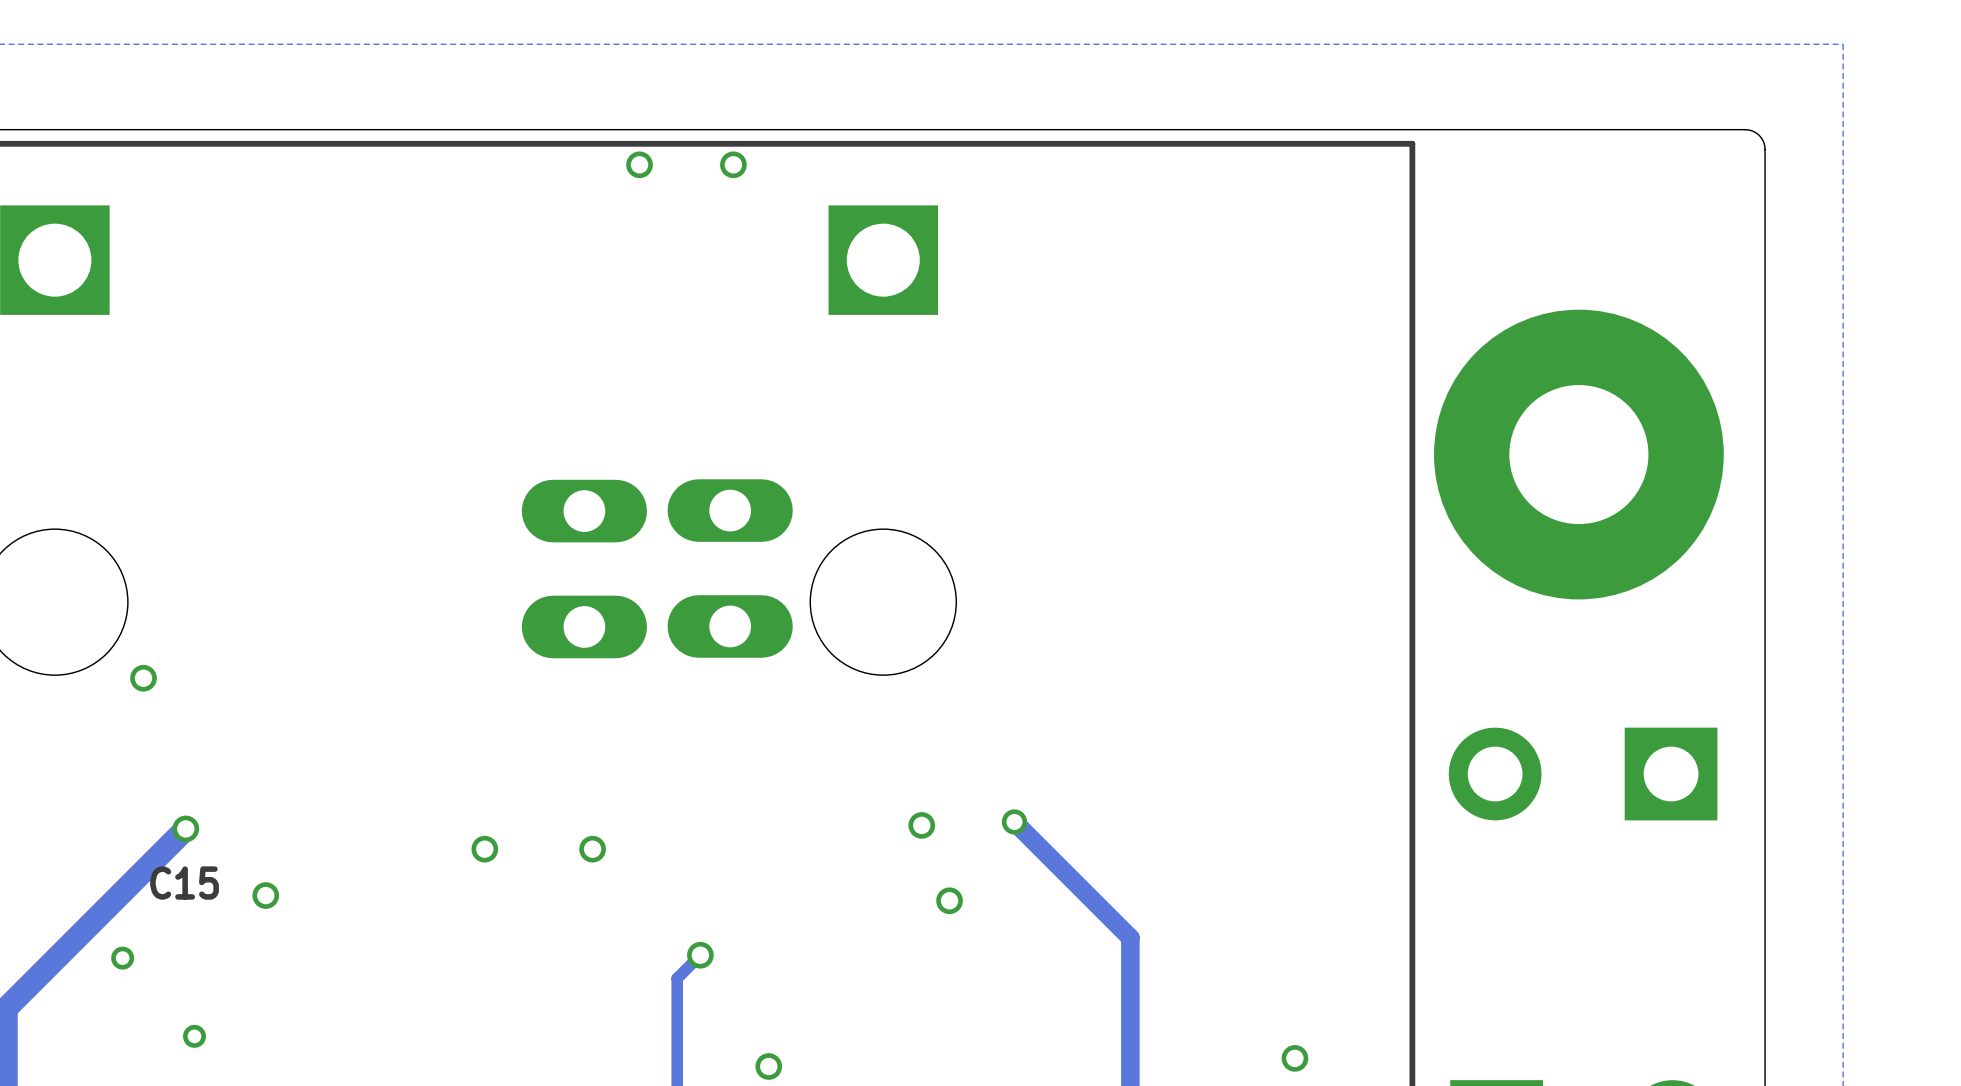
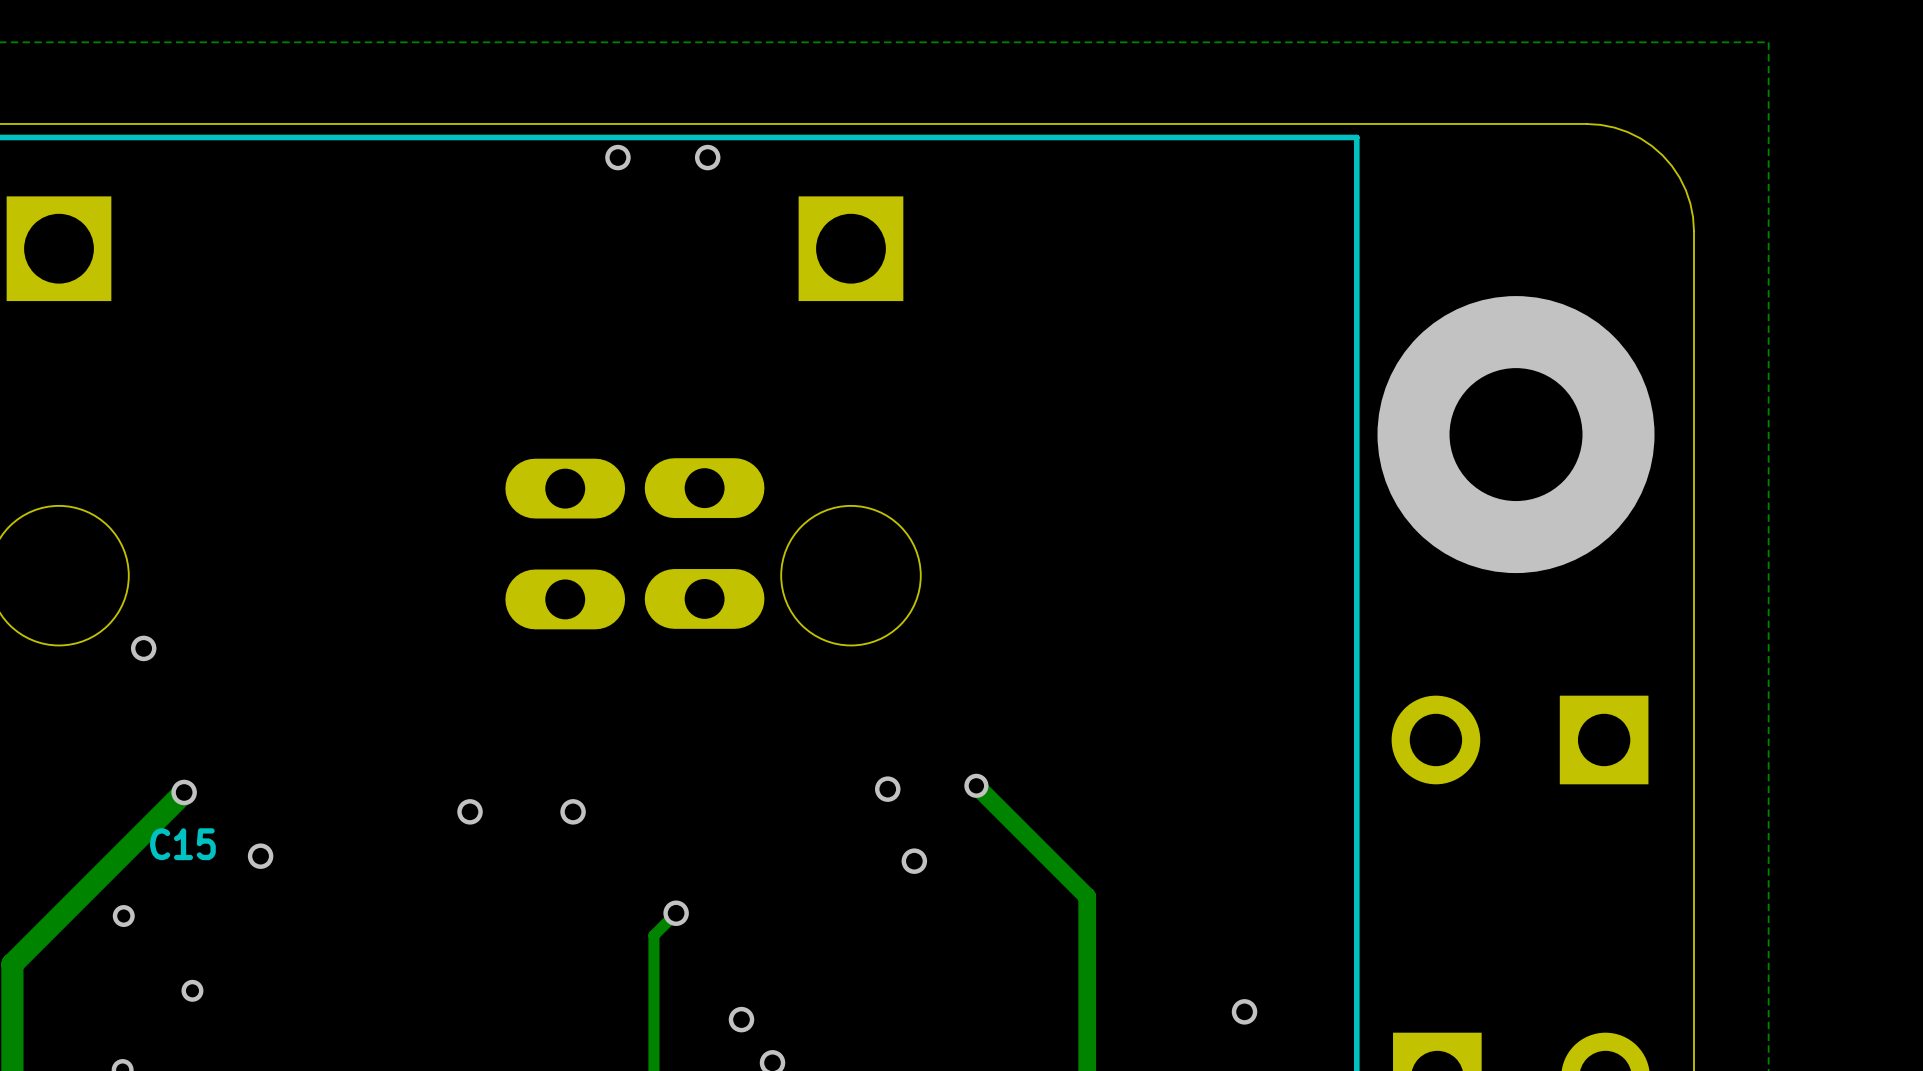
board edge: (1652, 129) (1745, 129) (1752, 131) (1759, 135) (1763, 141) (1765, 149) (1765, 241) -> (1586, 123) (1600, 124) (1627, 132) (1640, 138) (1662, 155) (1679, 177) (1685, 190) (1693, 217) (1693, 231)

